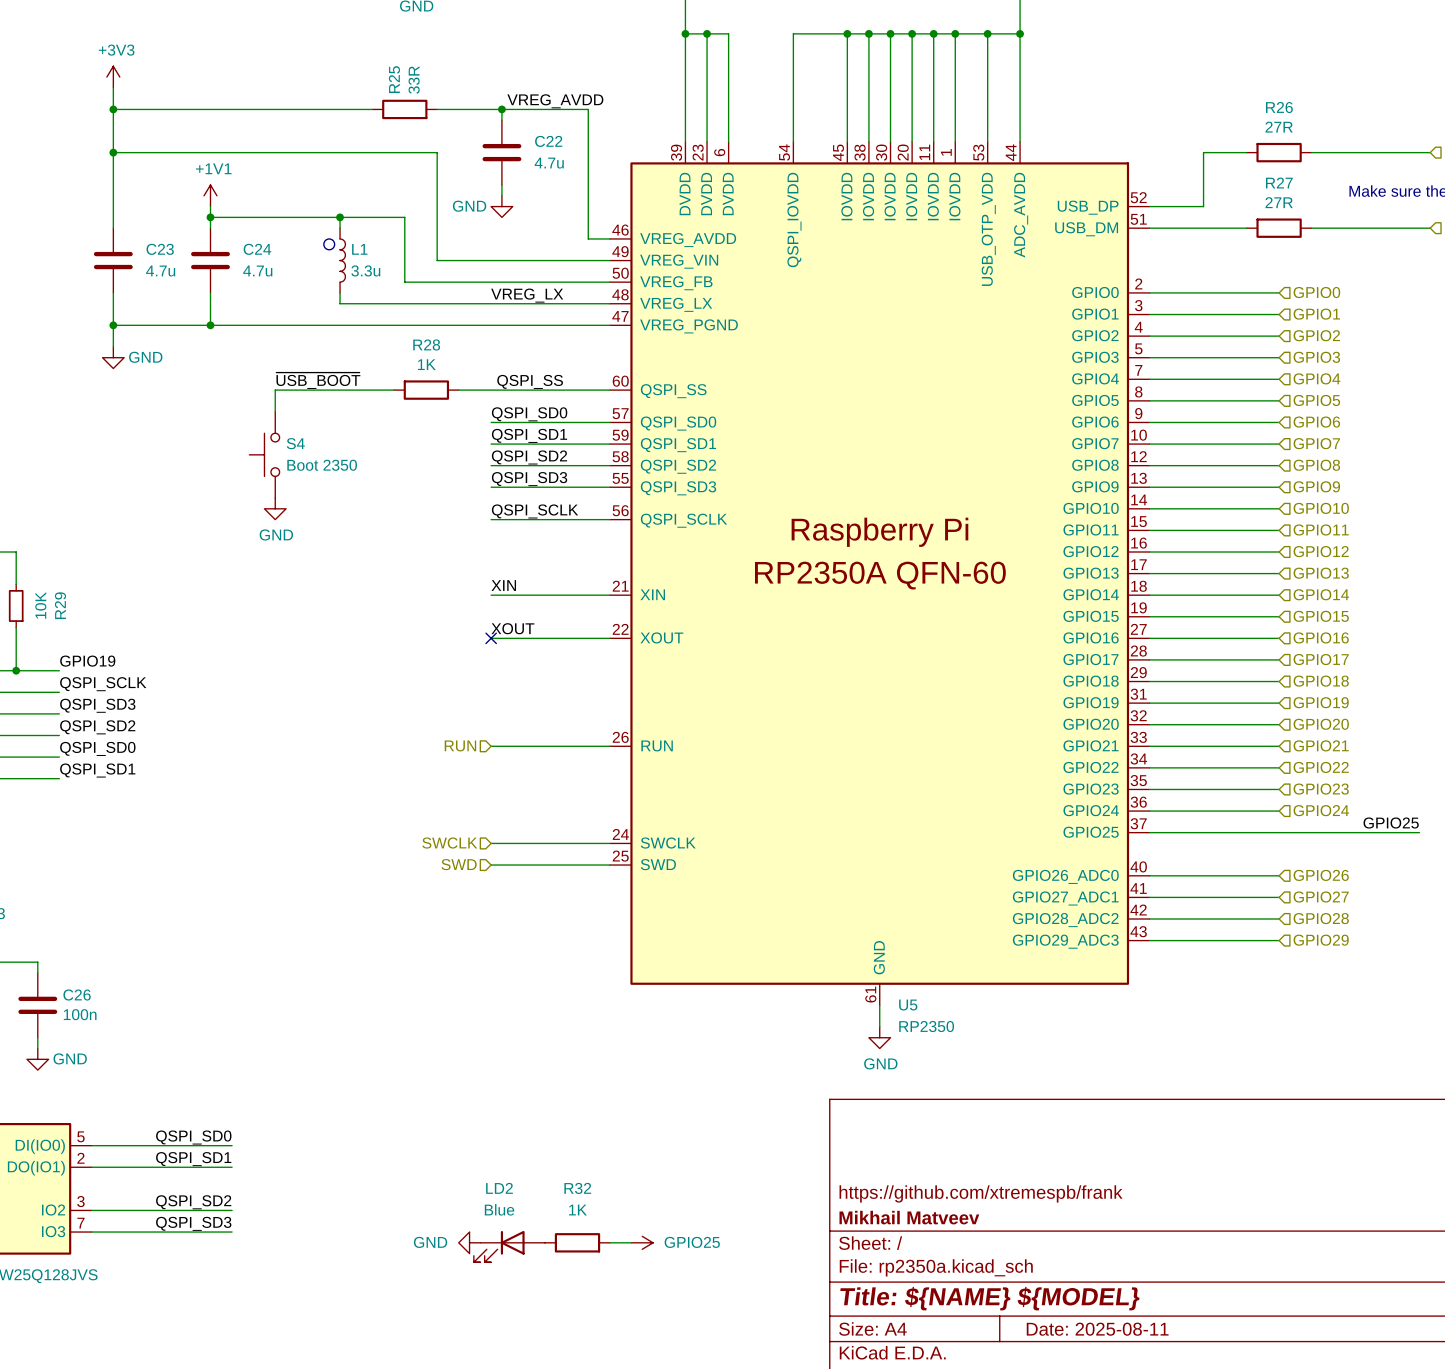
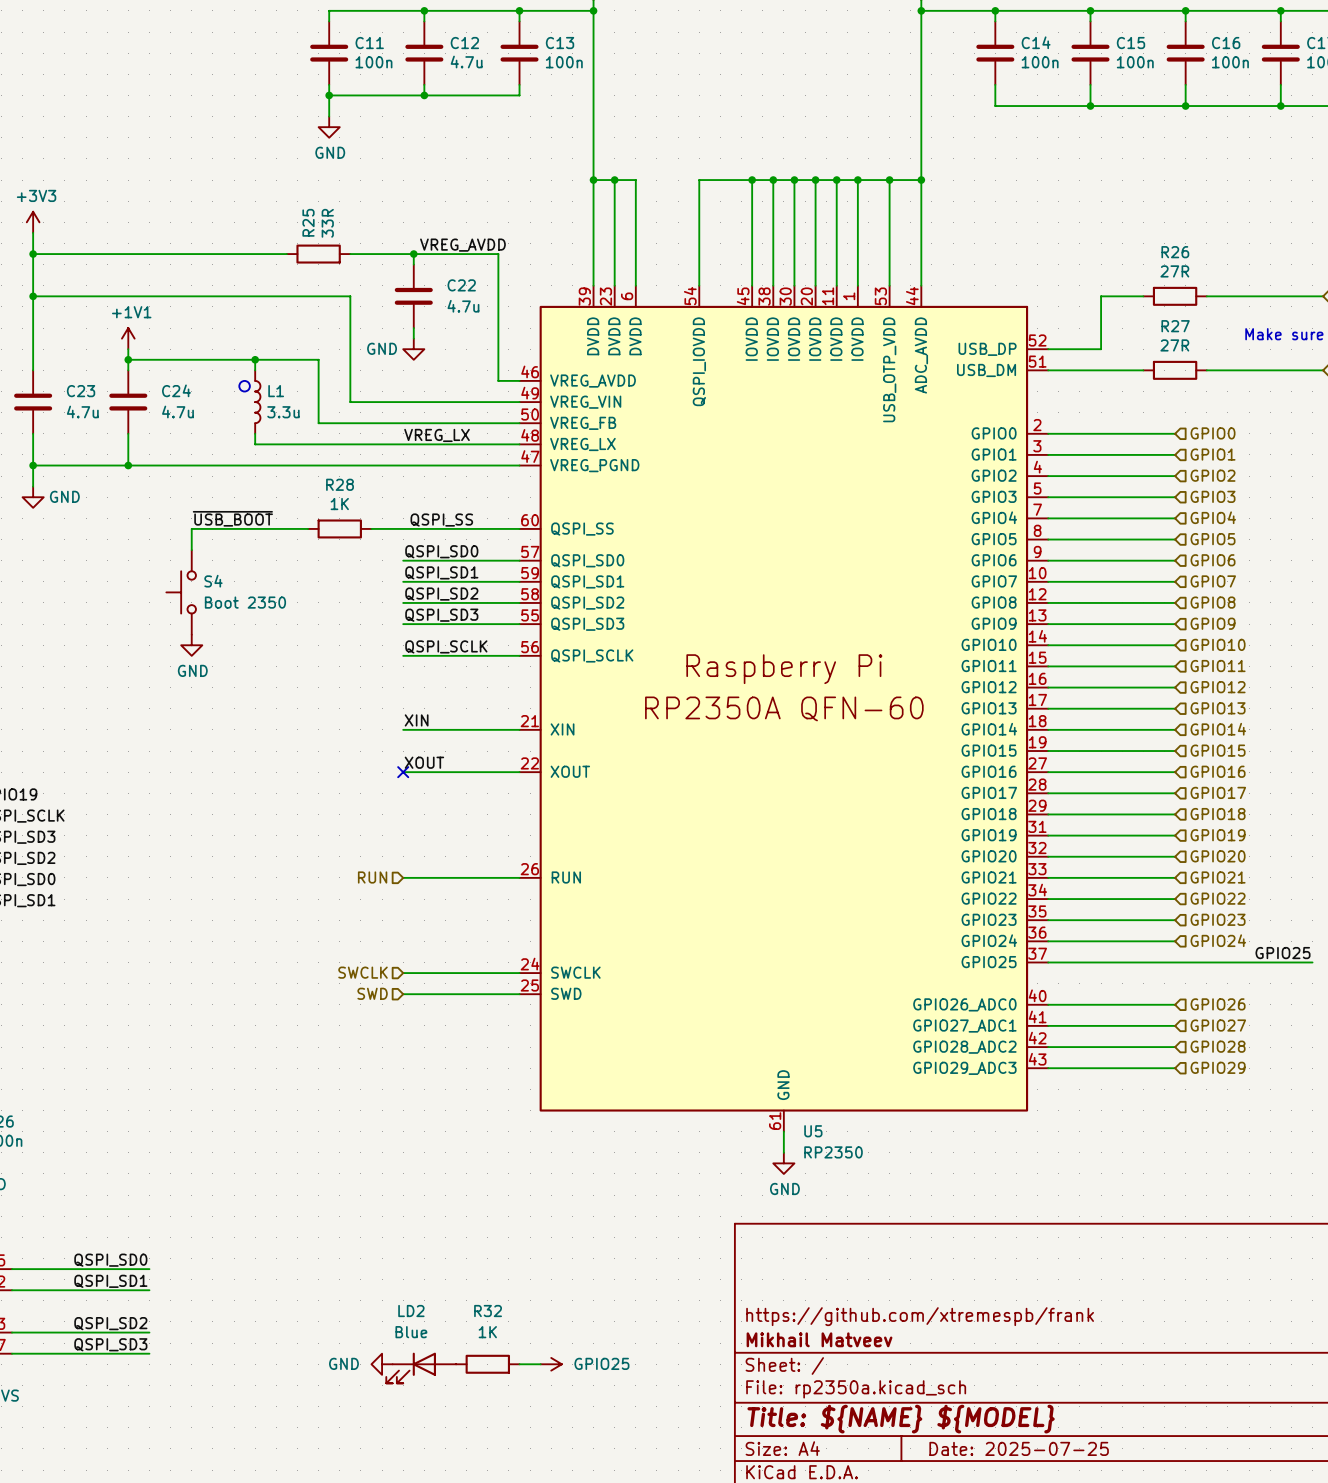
title block: Date: 2025-08-11 (1097, 1329) -> Date: 2025-07-25 (1019, 1448)

